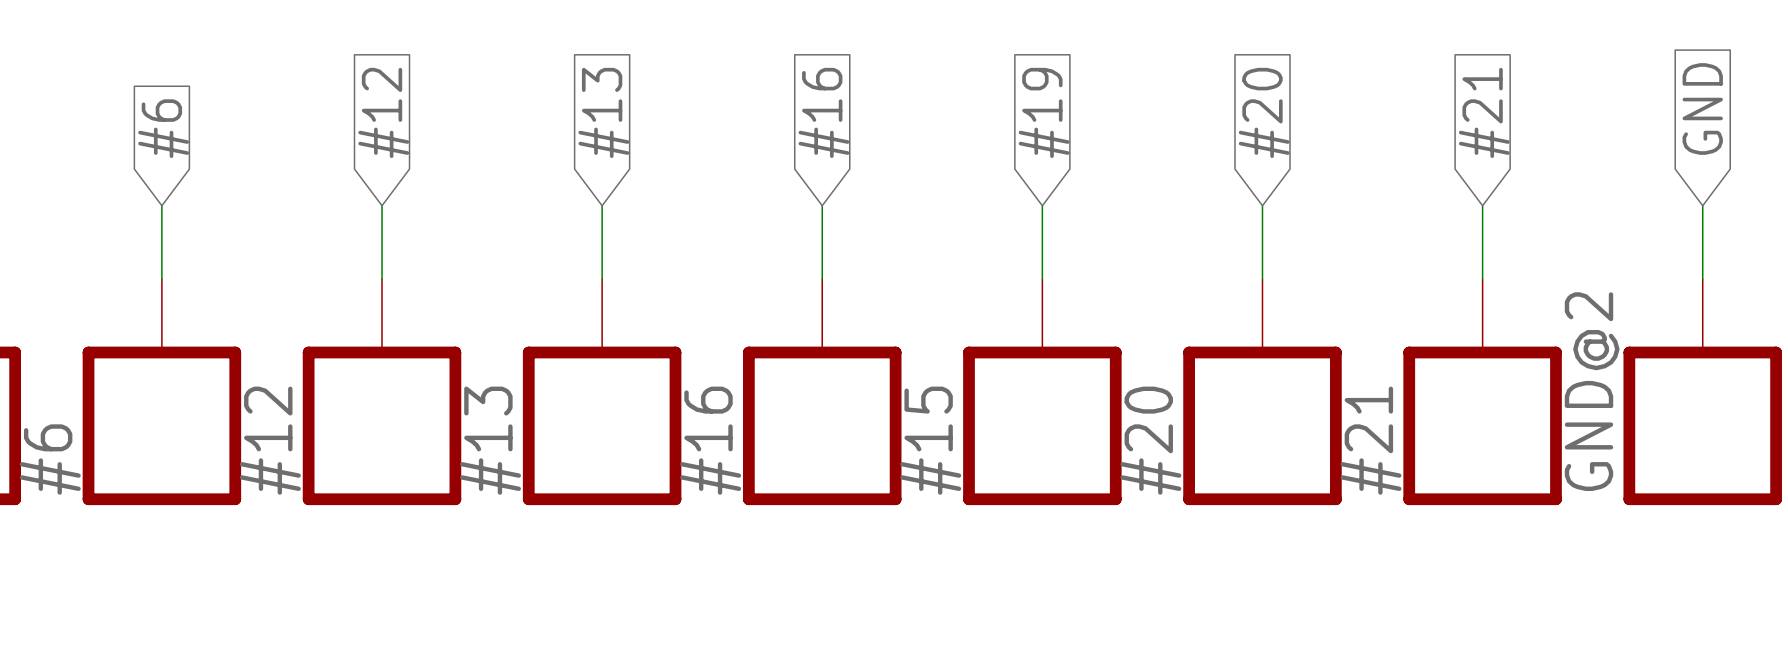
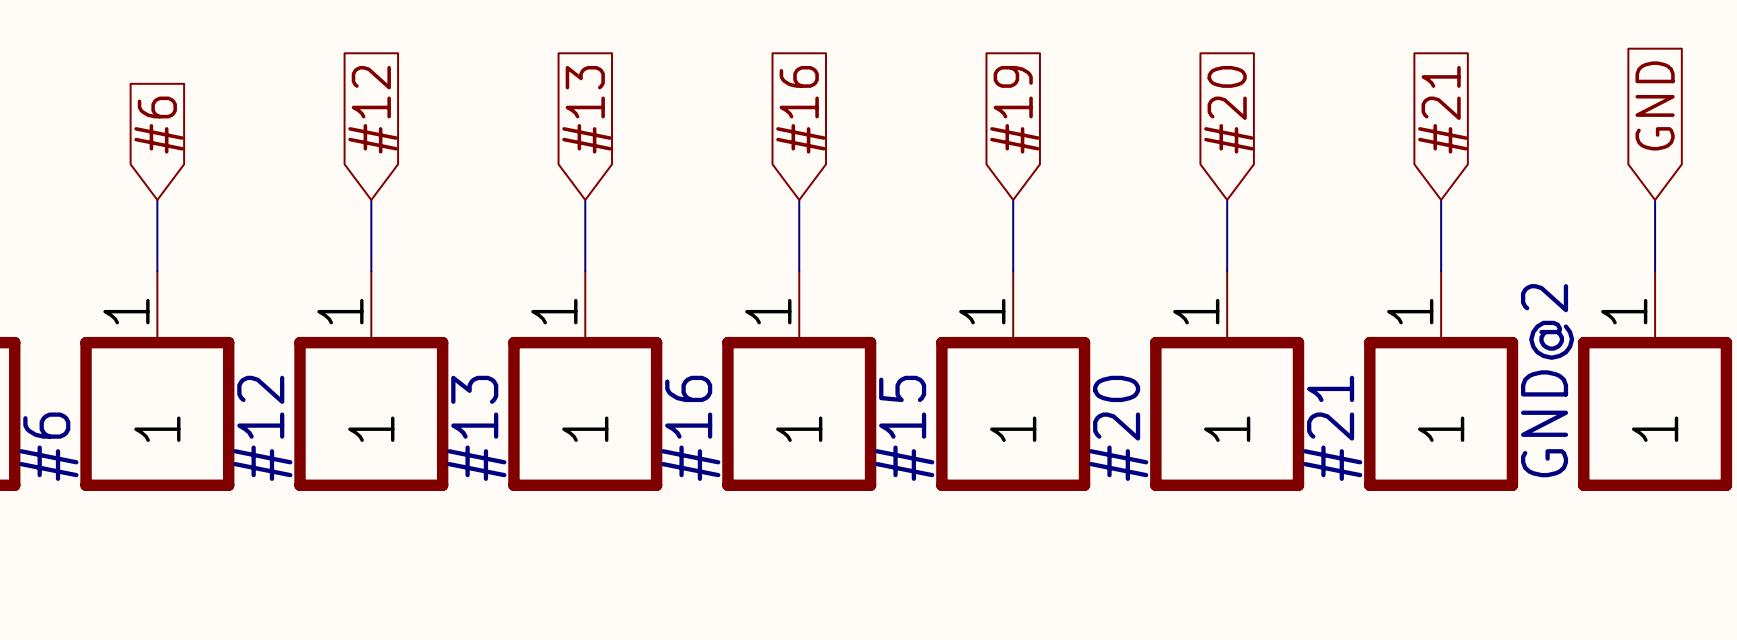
#6 pin number: none -> 1 (126, 311)
#12 pin number: none -> 1 (340, 311)
#13 pin number: none -> 1 (554, 311)
#16 pin number: none -> 1 (768, 311)
#15 pin number: none -> 1 (982, 311)
#20 pin number: none -> 1 (1196, 311)
#21 pin number: none -> 1 (1410, 311)
GND@2 pin number: none -> 1 (1624, 311)
#6 pin name: none -> 1 (157, 429)
#12 pin name: none -> 1 (371, 429)
#13 pin name: none -> 1 (585, 429)
#16 pin name: none -> 1 (799, 429)
#15 pin name: none -> 1 (1013, 429)
#20 pin name: none -> 1 (1227, 429)
#21 pin name: none -> 1 (1441, 429)
GND@2 pin name: none -> 1 (1655, 429)

